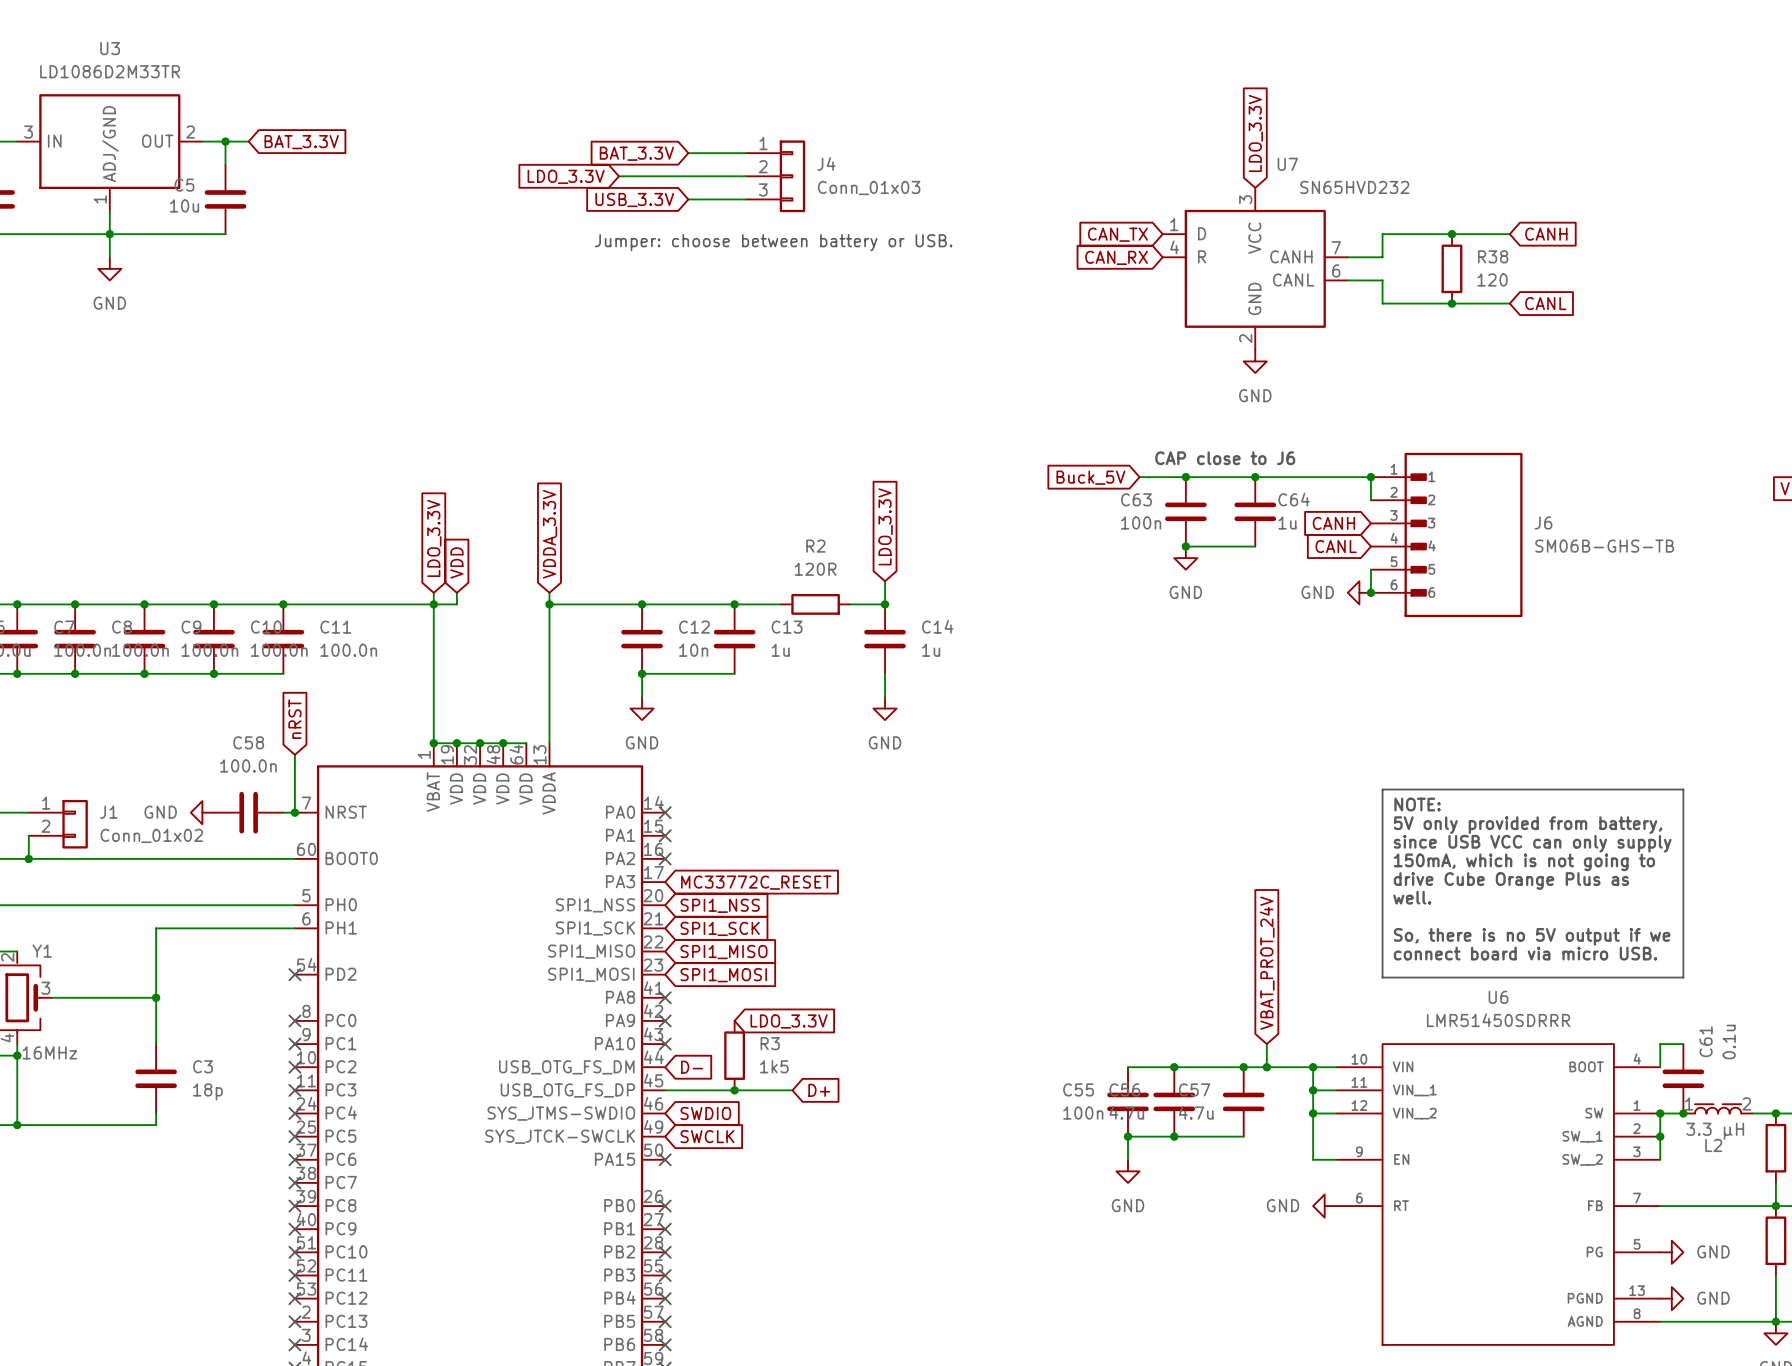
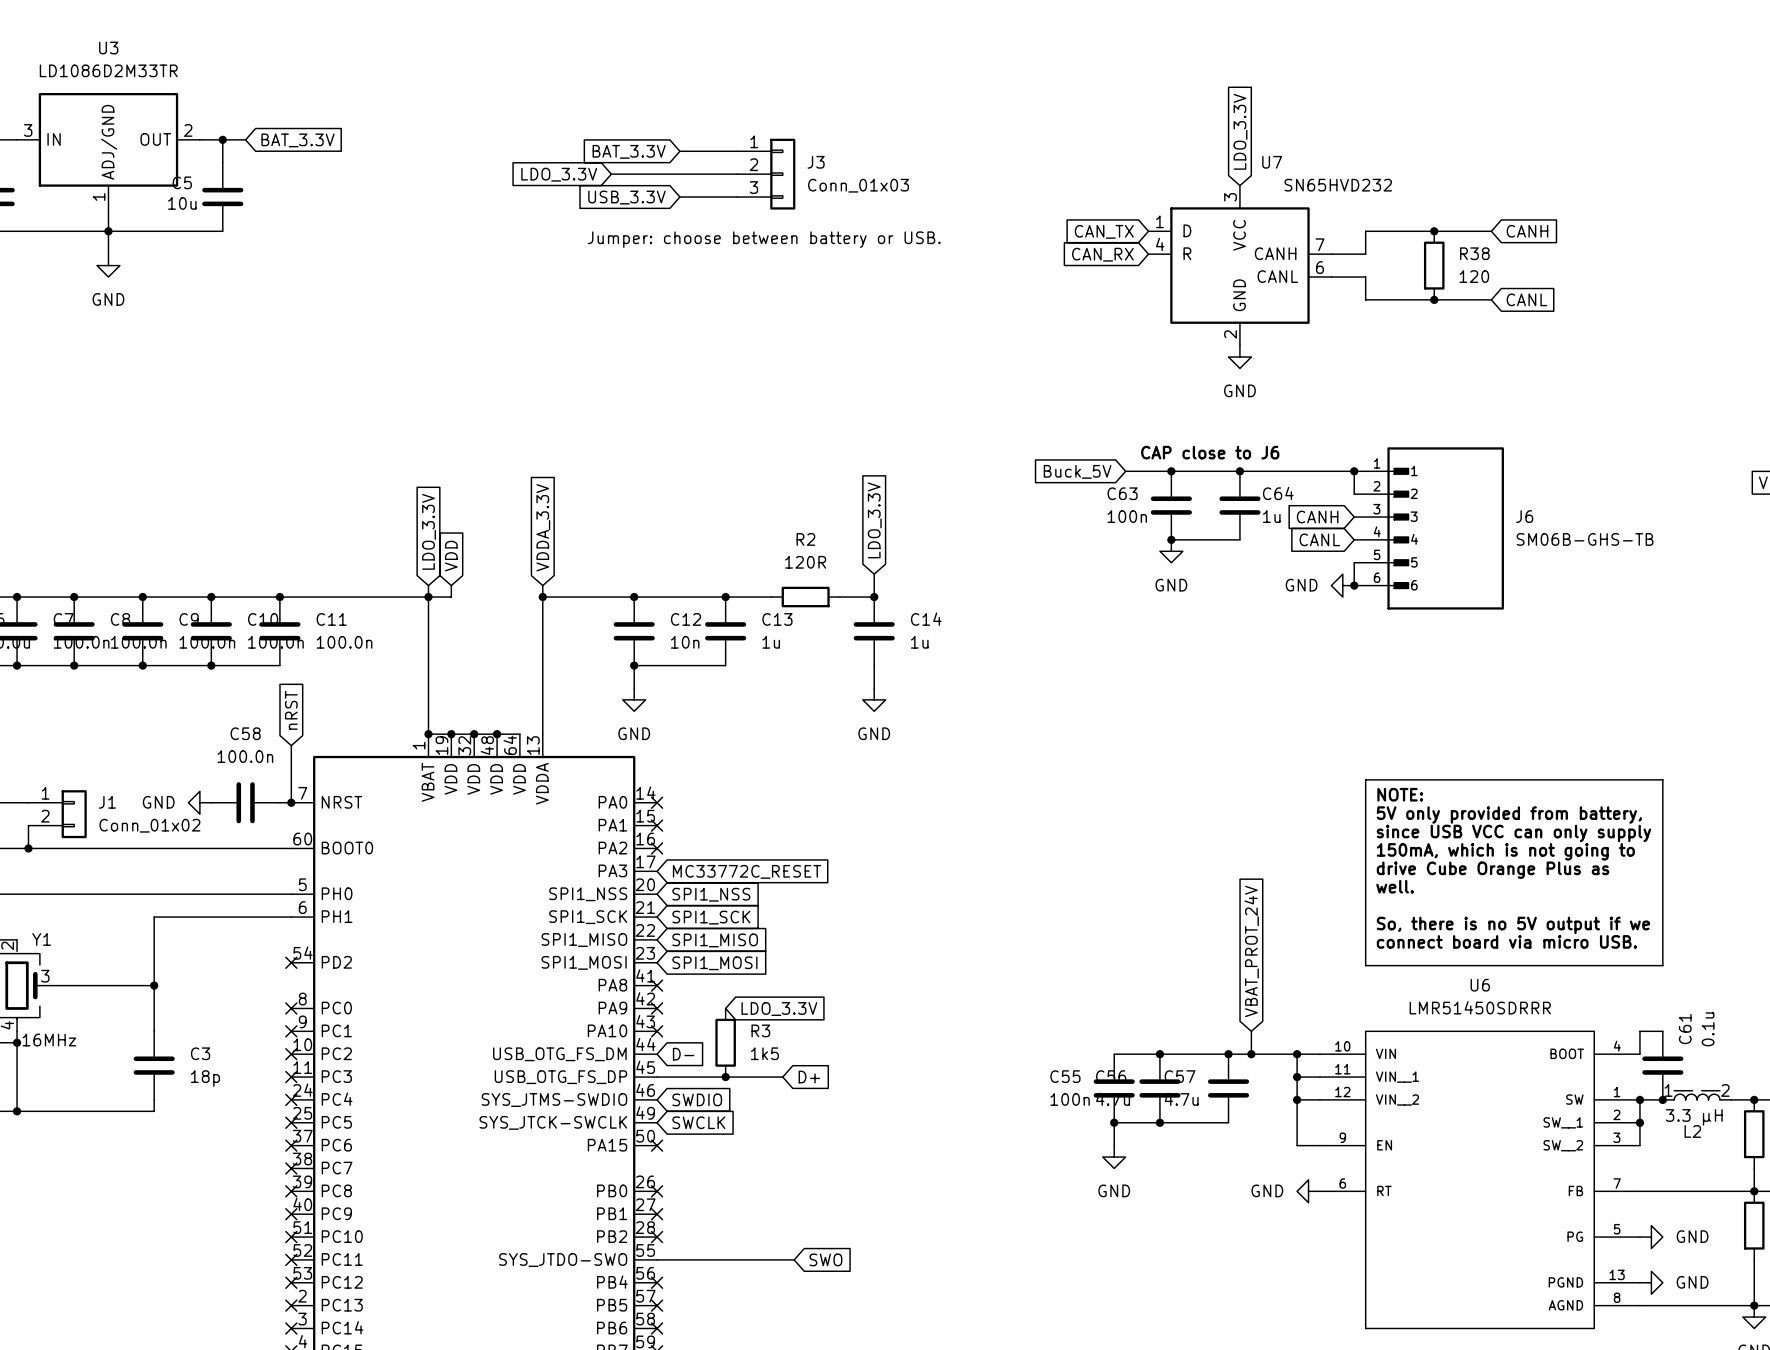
J4 name: J4 (826, 164) -> J3 (816, 162)
part pin name: PB3 (619, 1275) -> SYS_JTDO-SWO (563, 1260)
wire: none -> (657, 1259) (794, 1259)
no-connect mark: (665, 1275) -> none
global label: none -> SWO (825, 1259)

